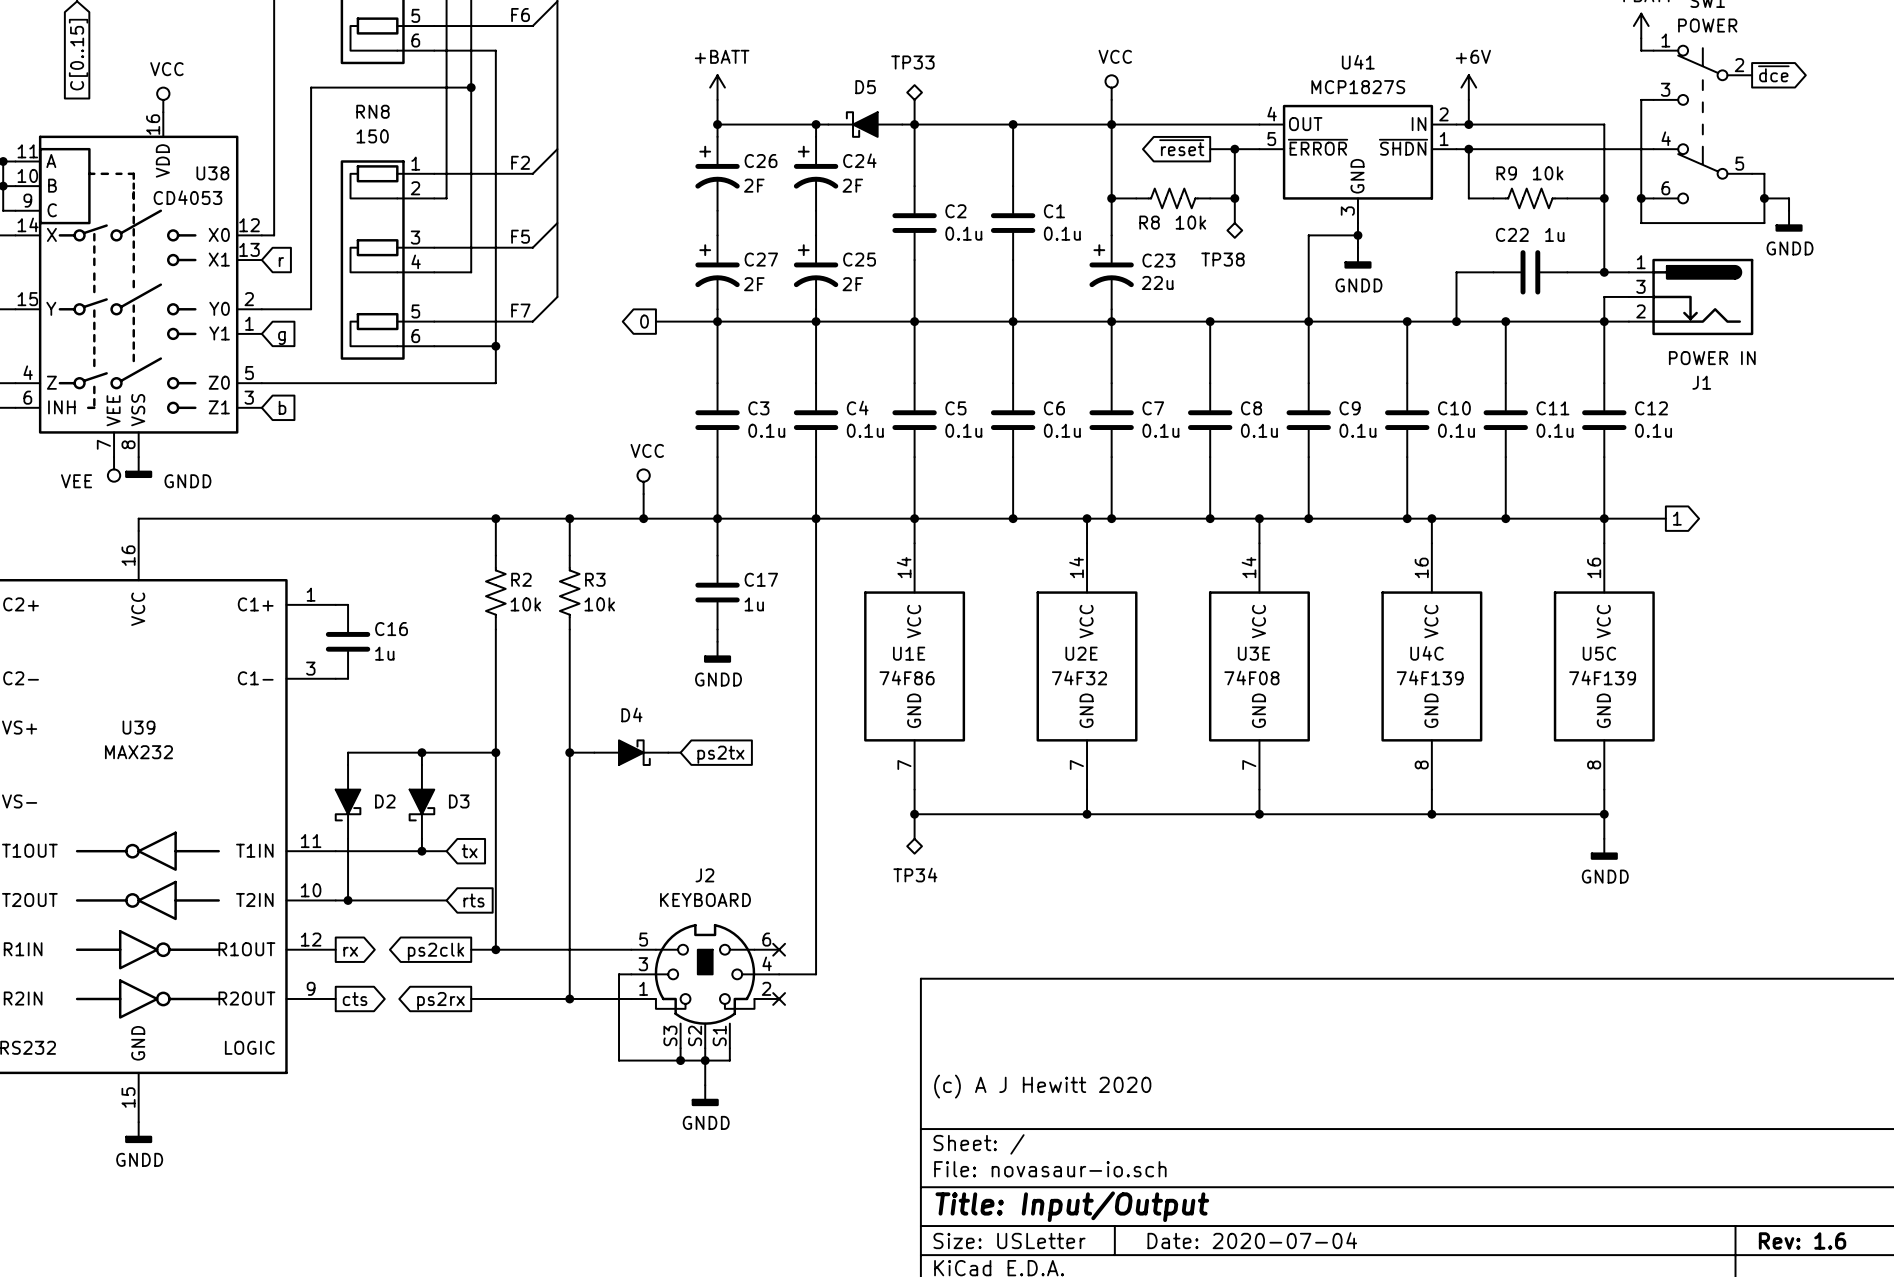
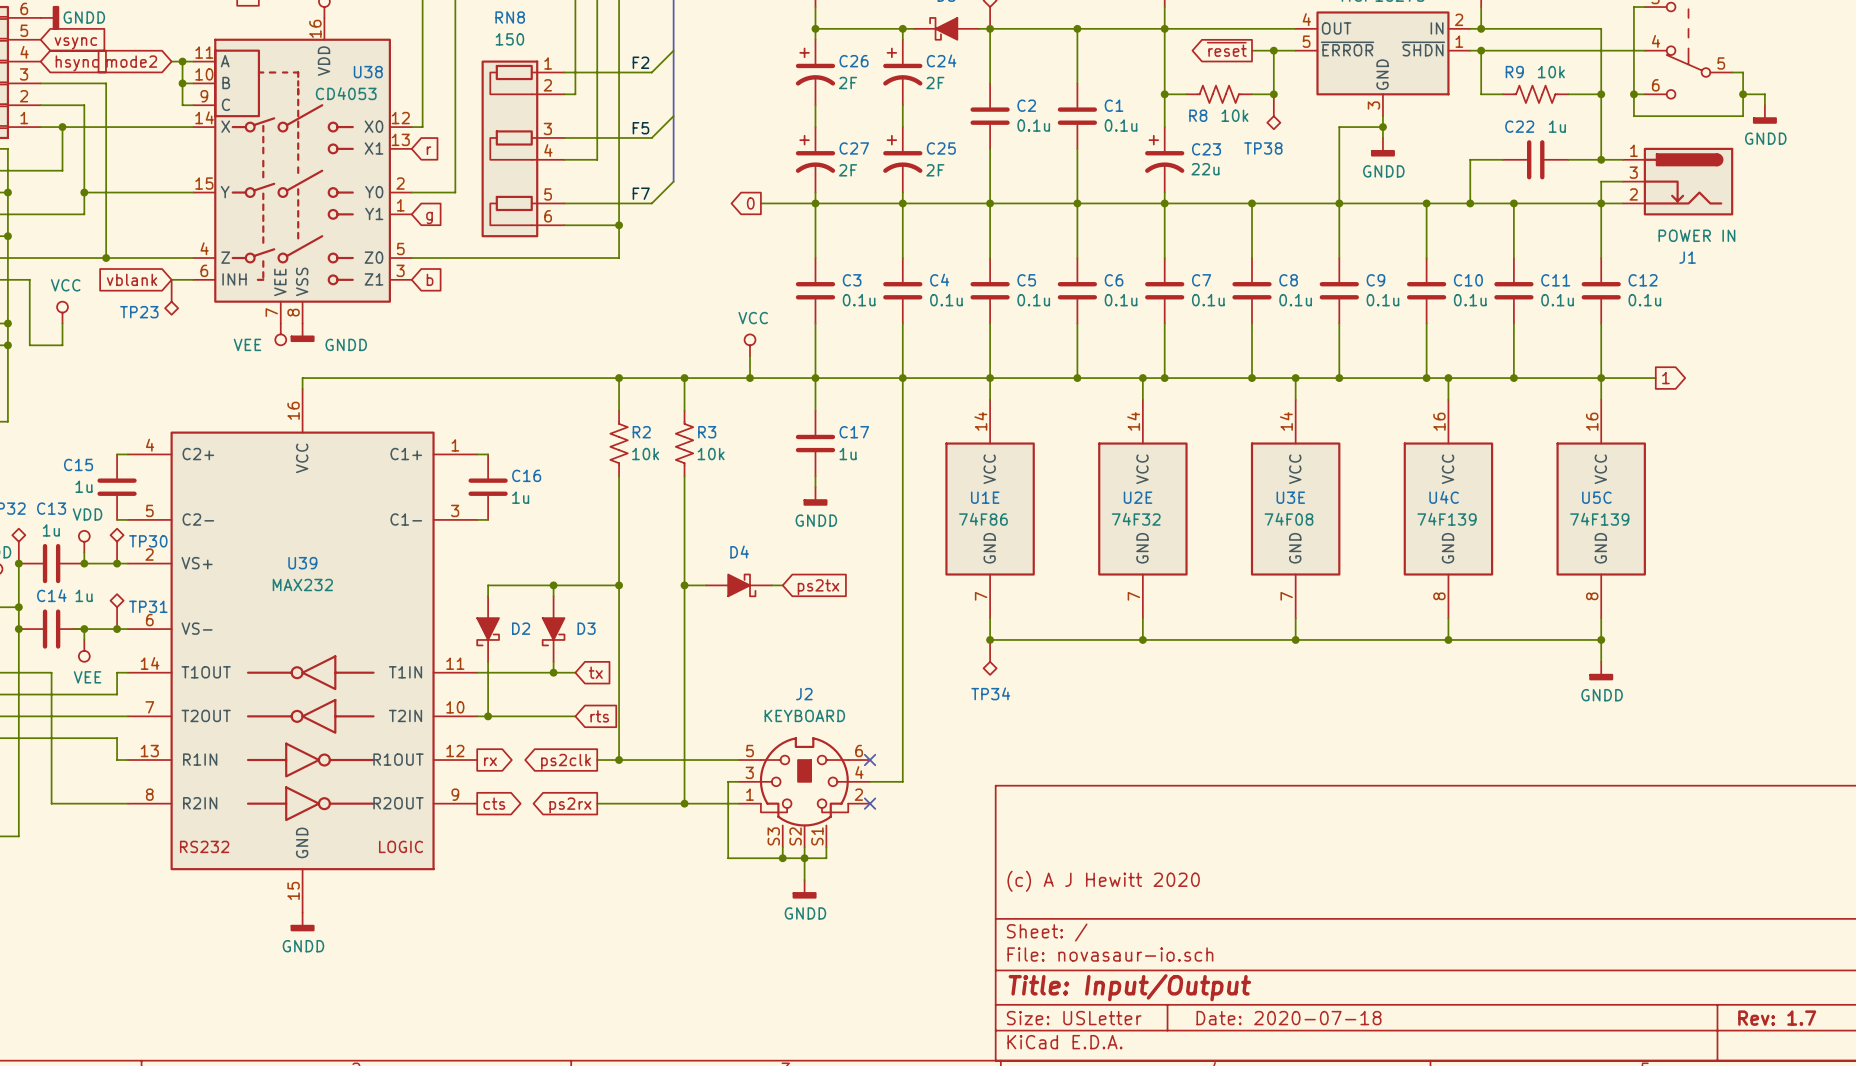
title block: Date: 2020-07-04 (1252, 1240) -> Date: 2020-07-18 (1289, 1018)
title block: Rev: 1.6 (1802, 1240) -> Rev: 1.7 (1777, 1018)

